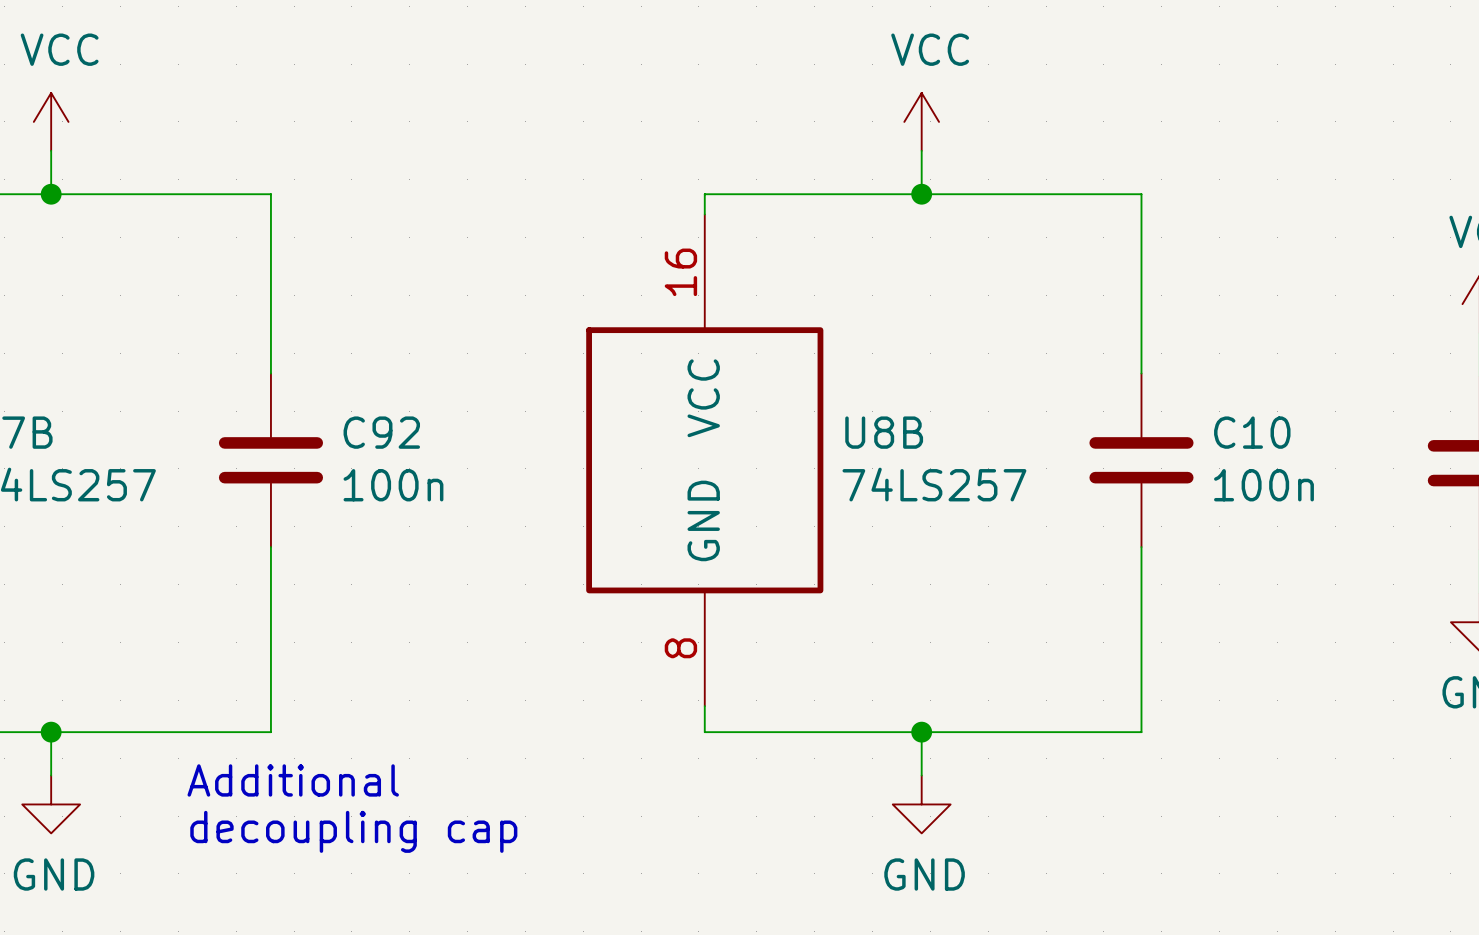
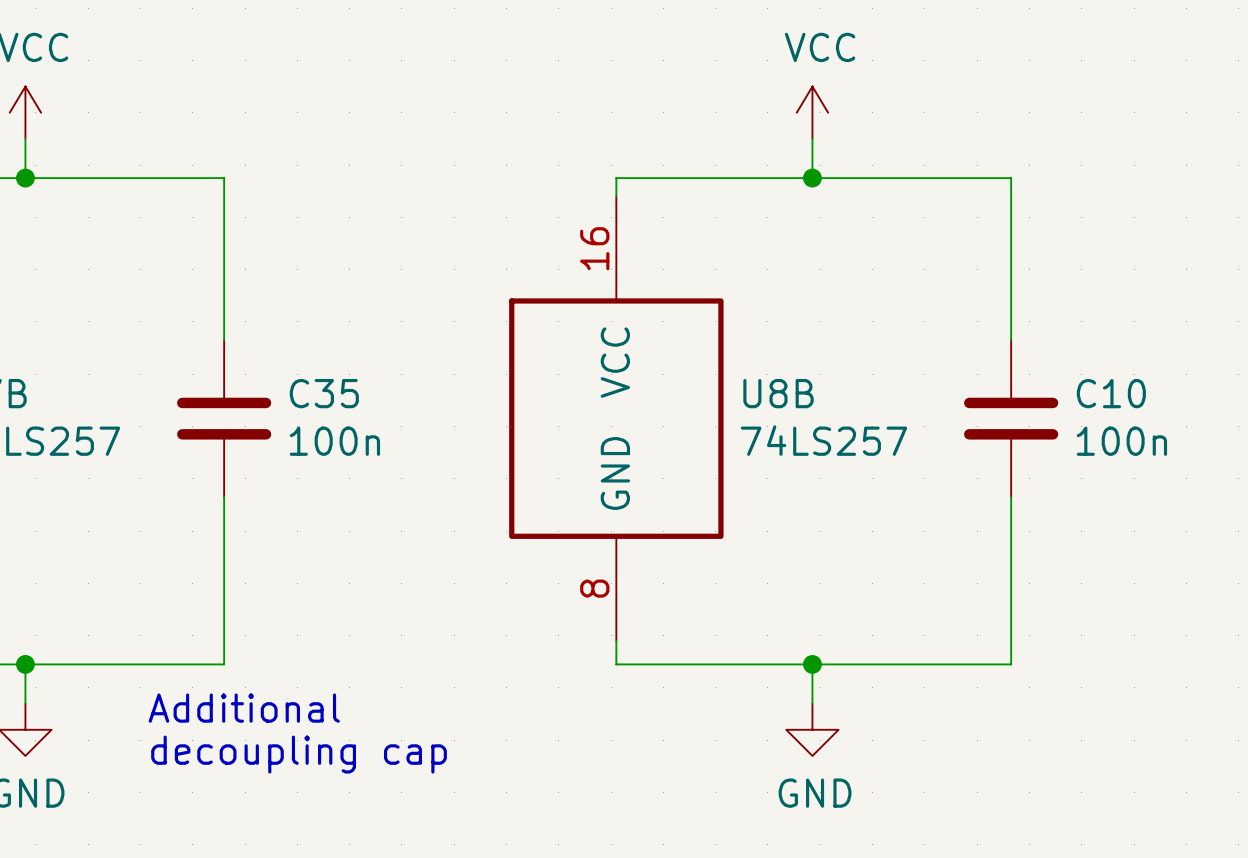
C92 name: C92 (381, 432) -> C35 (324, 393)

